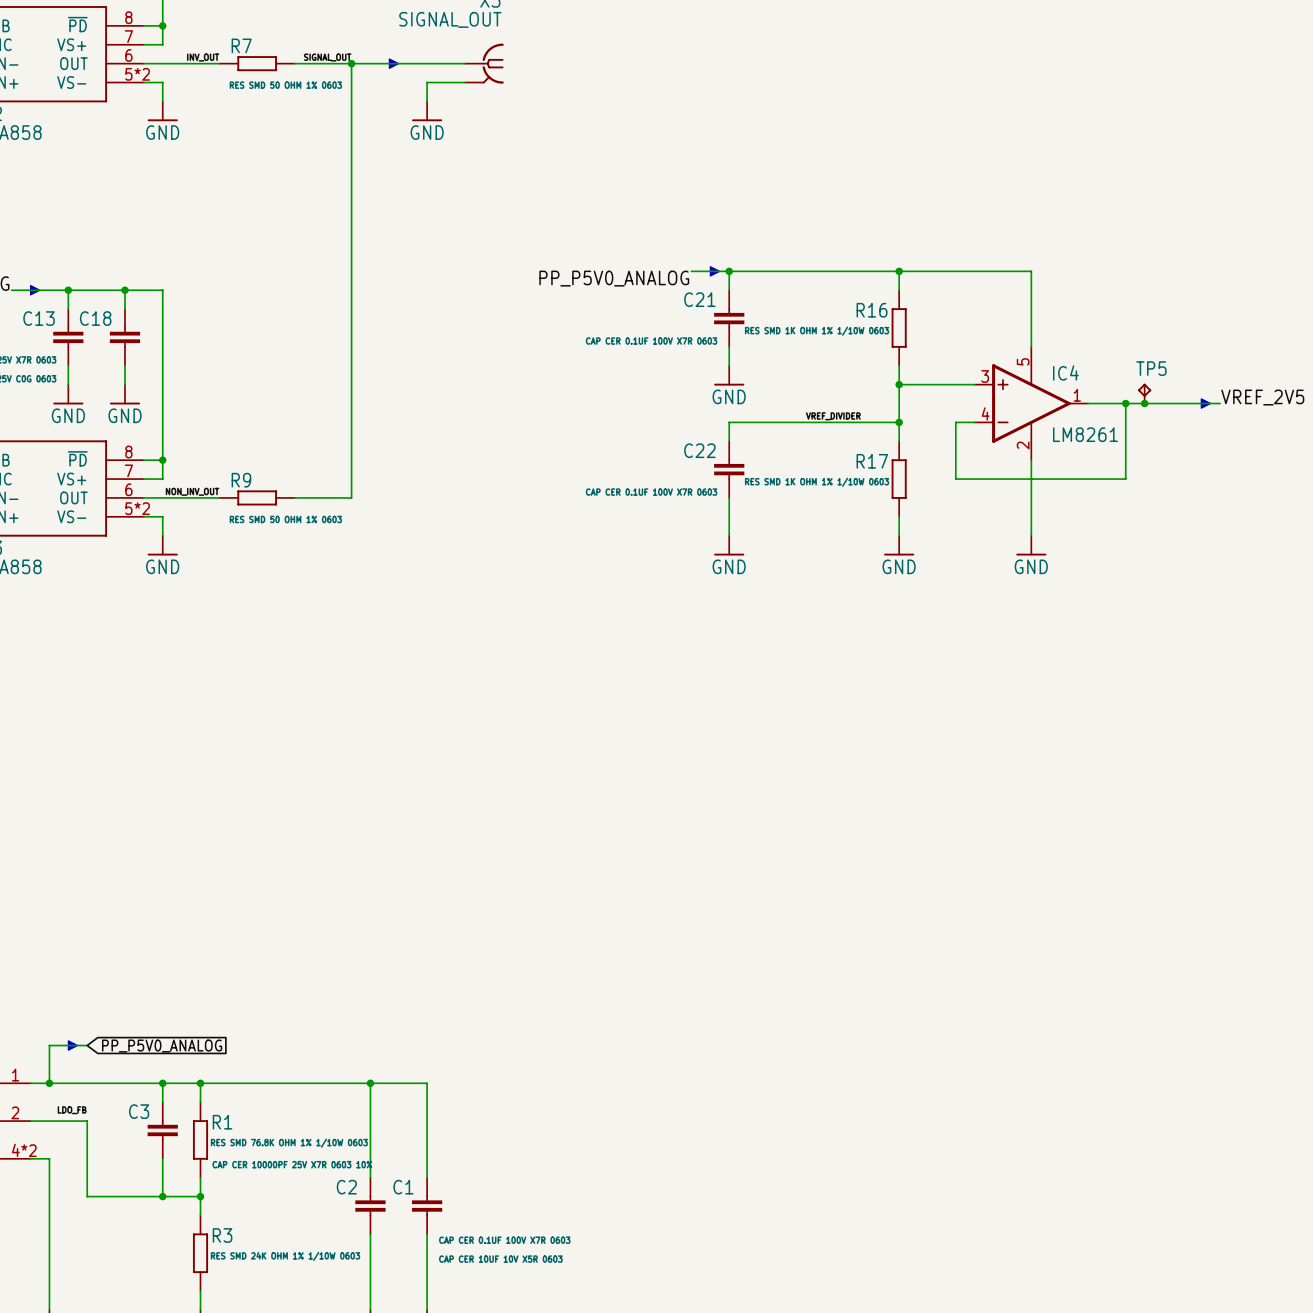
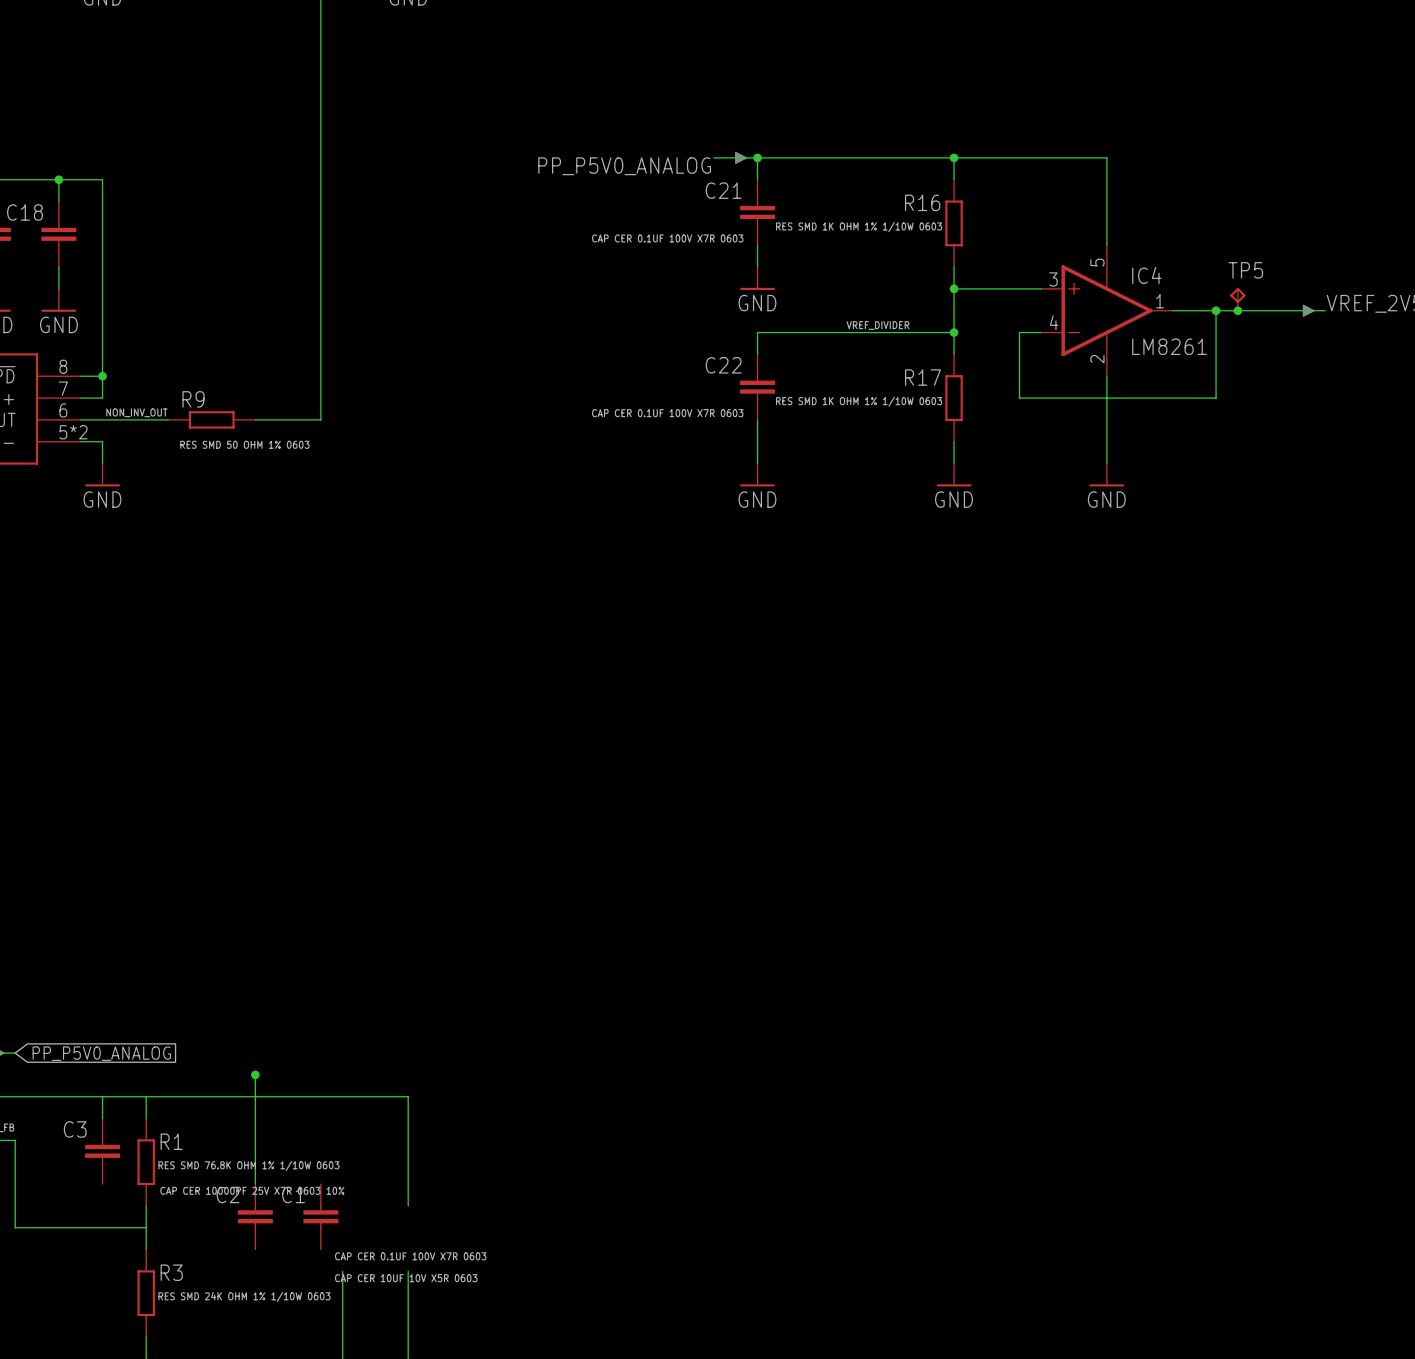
junction: none -> (255, 1074)
junction: (162, 1083) -> none
junction: (200, 1083) -> none
wire: (370, 1083) (370, 1177) -> (255, 1074) (255, 1184)
junction: (370, 1083) -> none
wire: (162, 1158) (162, 1196) -> none
junction: (162, 1196) -> none
junction: (200, 1196) -> none
C2 position: (370, 1206) -> (255, 1216)
C1 position: (427, 1206) -> (320, 1216)

